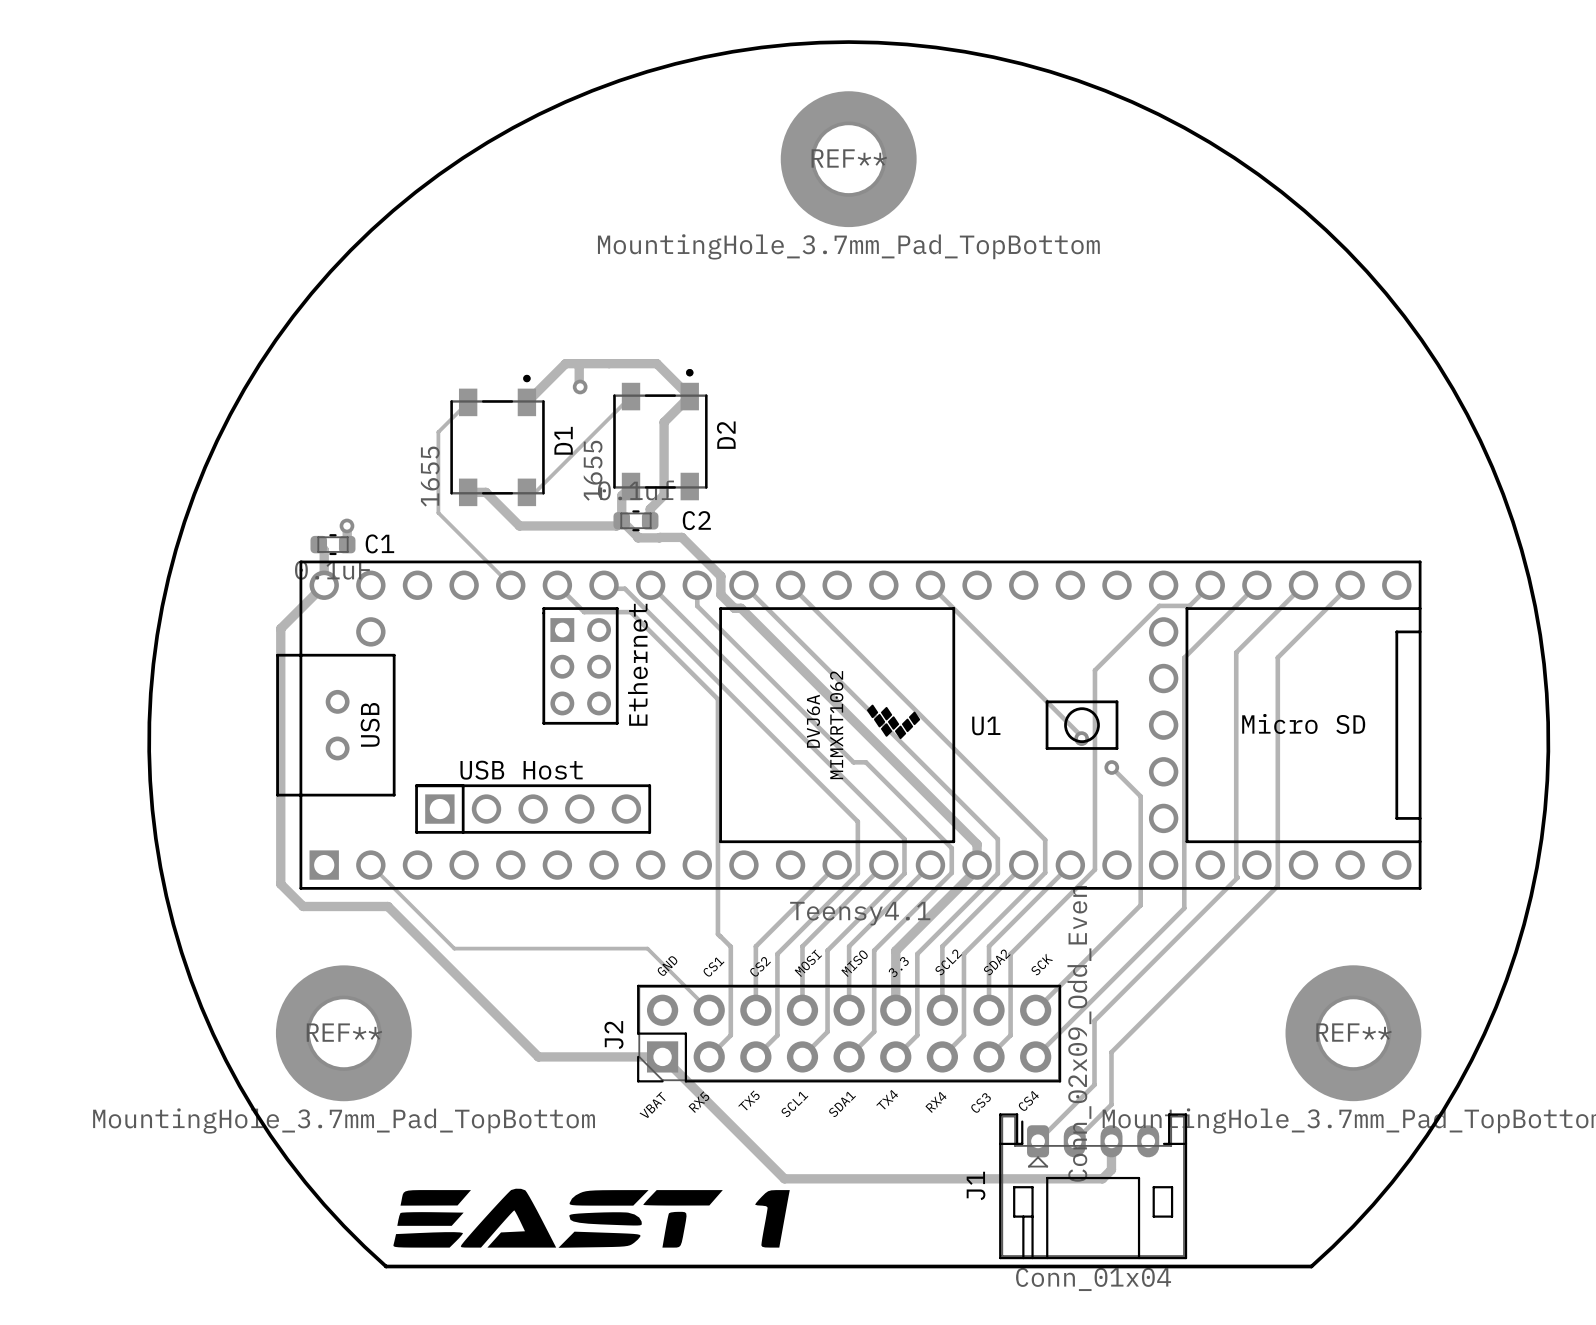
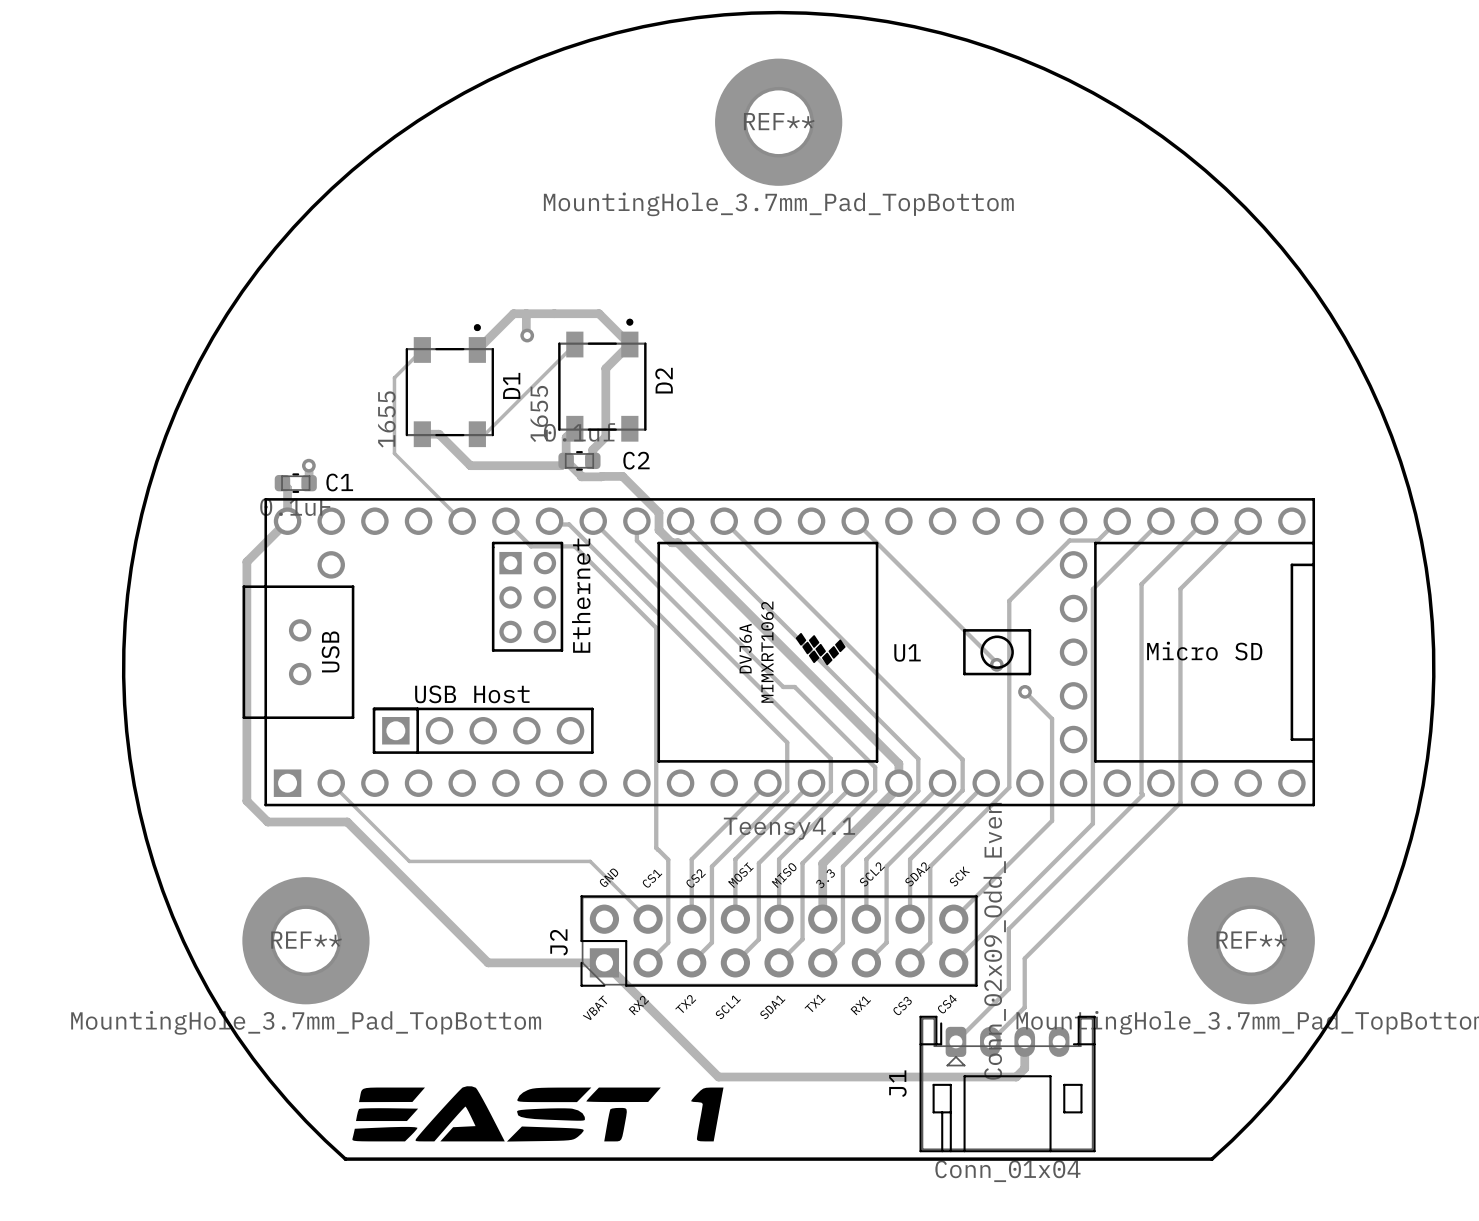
text: TX4 (887, 1099) -> TX1 (815, 1003)
text: TX5 (748, 1100) -> TX2 (685, 1004)
text: RX5 (698, 1102) -> RX2 (638, 1005)
text: RX4 (935, 1102) -> RX1 (860, 1005)

